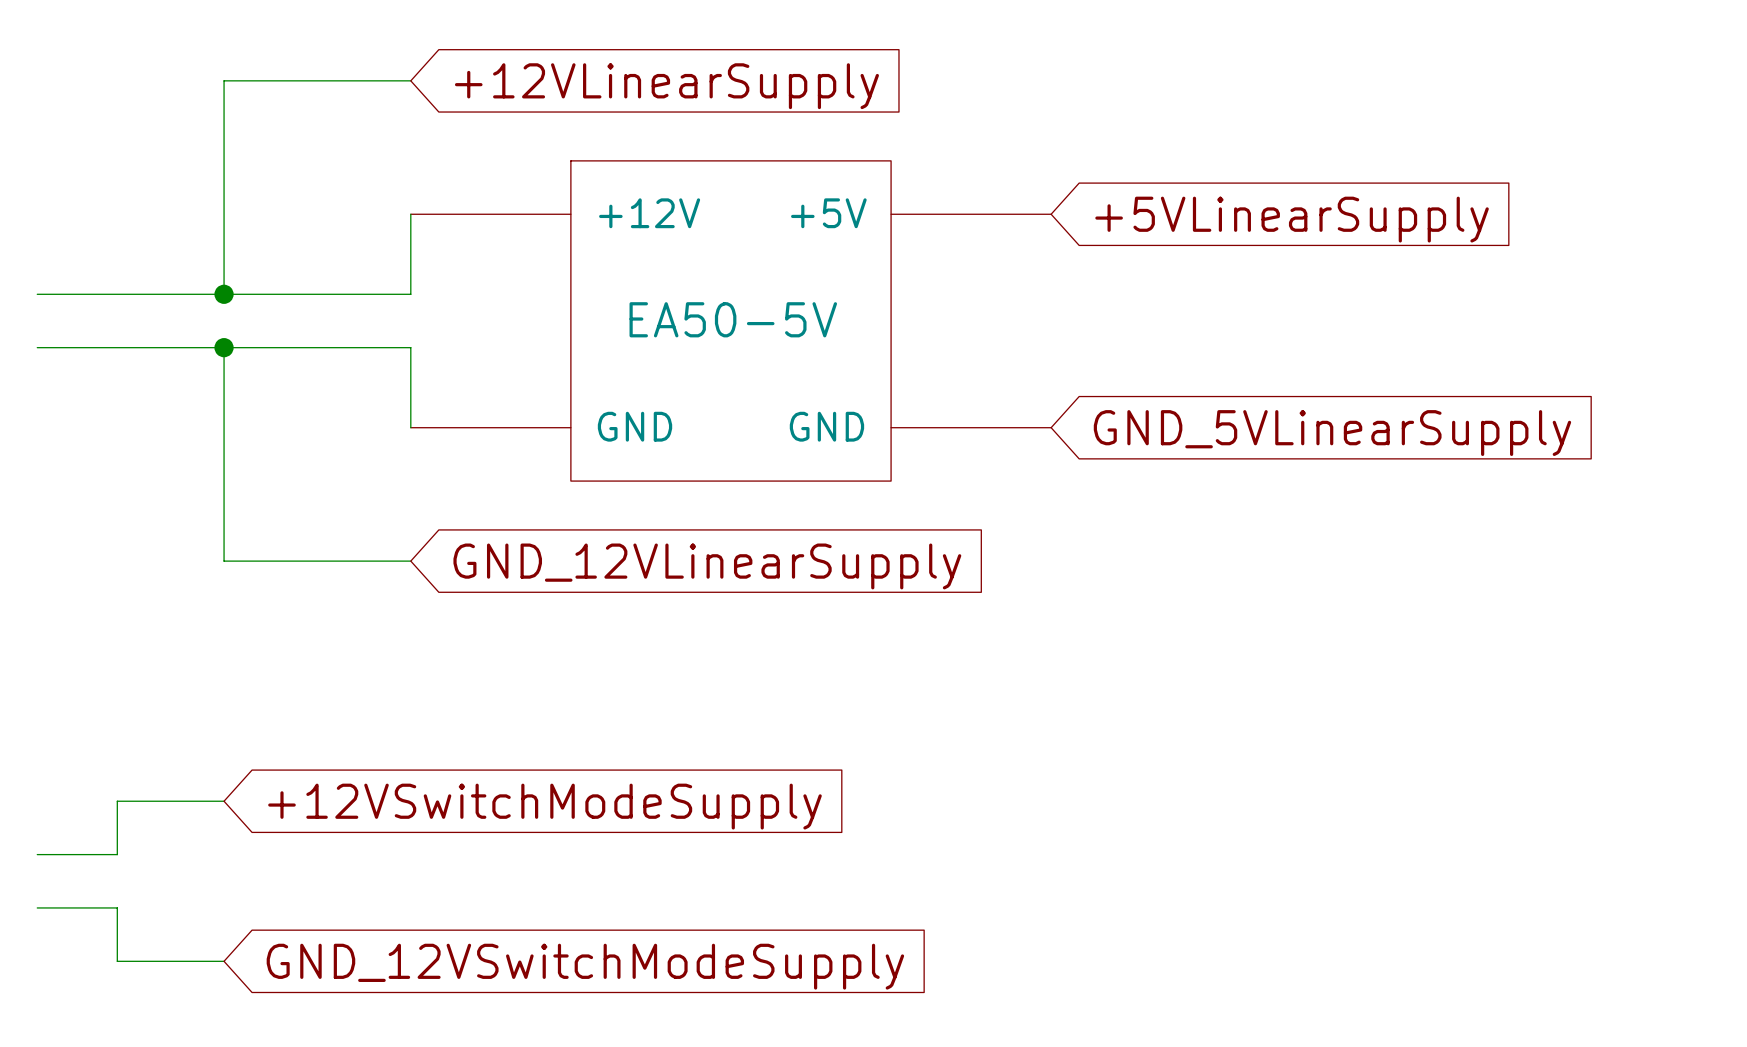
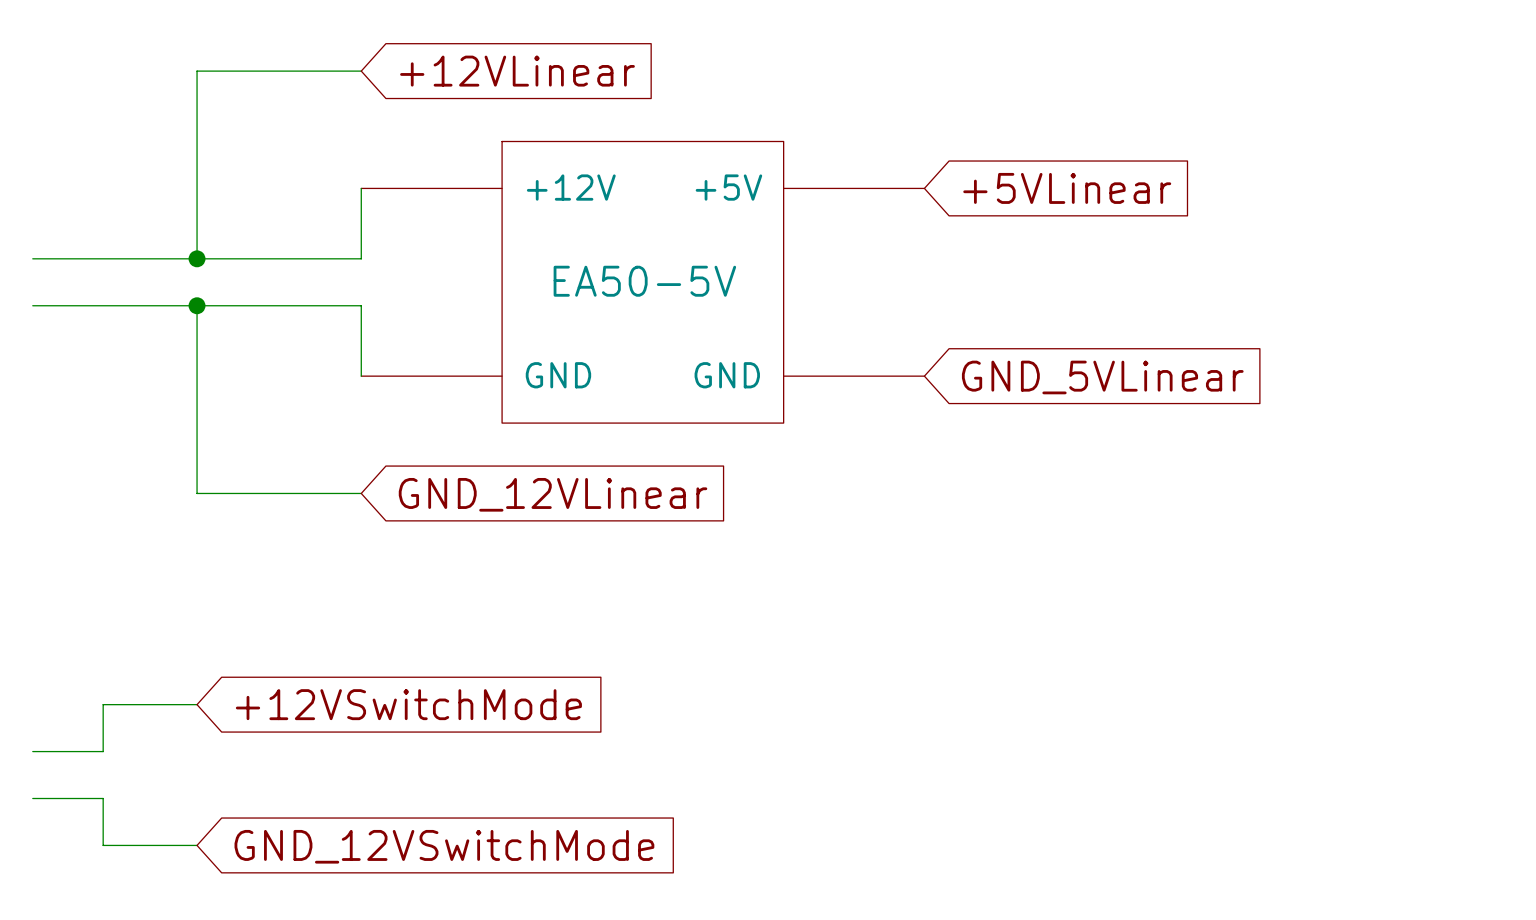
global label: +12VLinearSupply (666, 86) -> +12VLinear (517, 71)
global label: +5VLinearSupply (1292, 219) -> +5VLinear (1067, 188)
global label: GND_5VLinearSupply (1332, 433) -> GND_5VLinear (1102, 377)
global label: GND_12VLinearSupply (707, 566) -> GND_12VLinear (553, 494)
global label: +12VSwitchModeSupply (544, 806) -> +12VSwitchMode (408, 704)
global label: GND_12VSwitchModeSupply (585, 966) -> GND_12VSwitchMode (444, 846)

